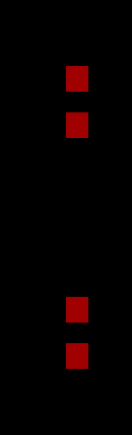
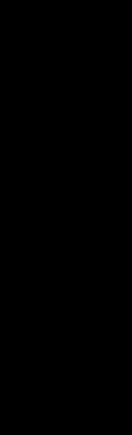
part: (77, 102) -> none
part: (77, 332) -> none

